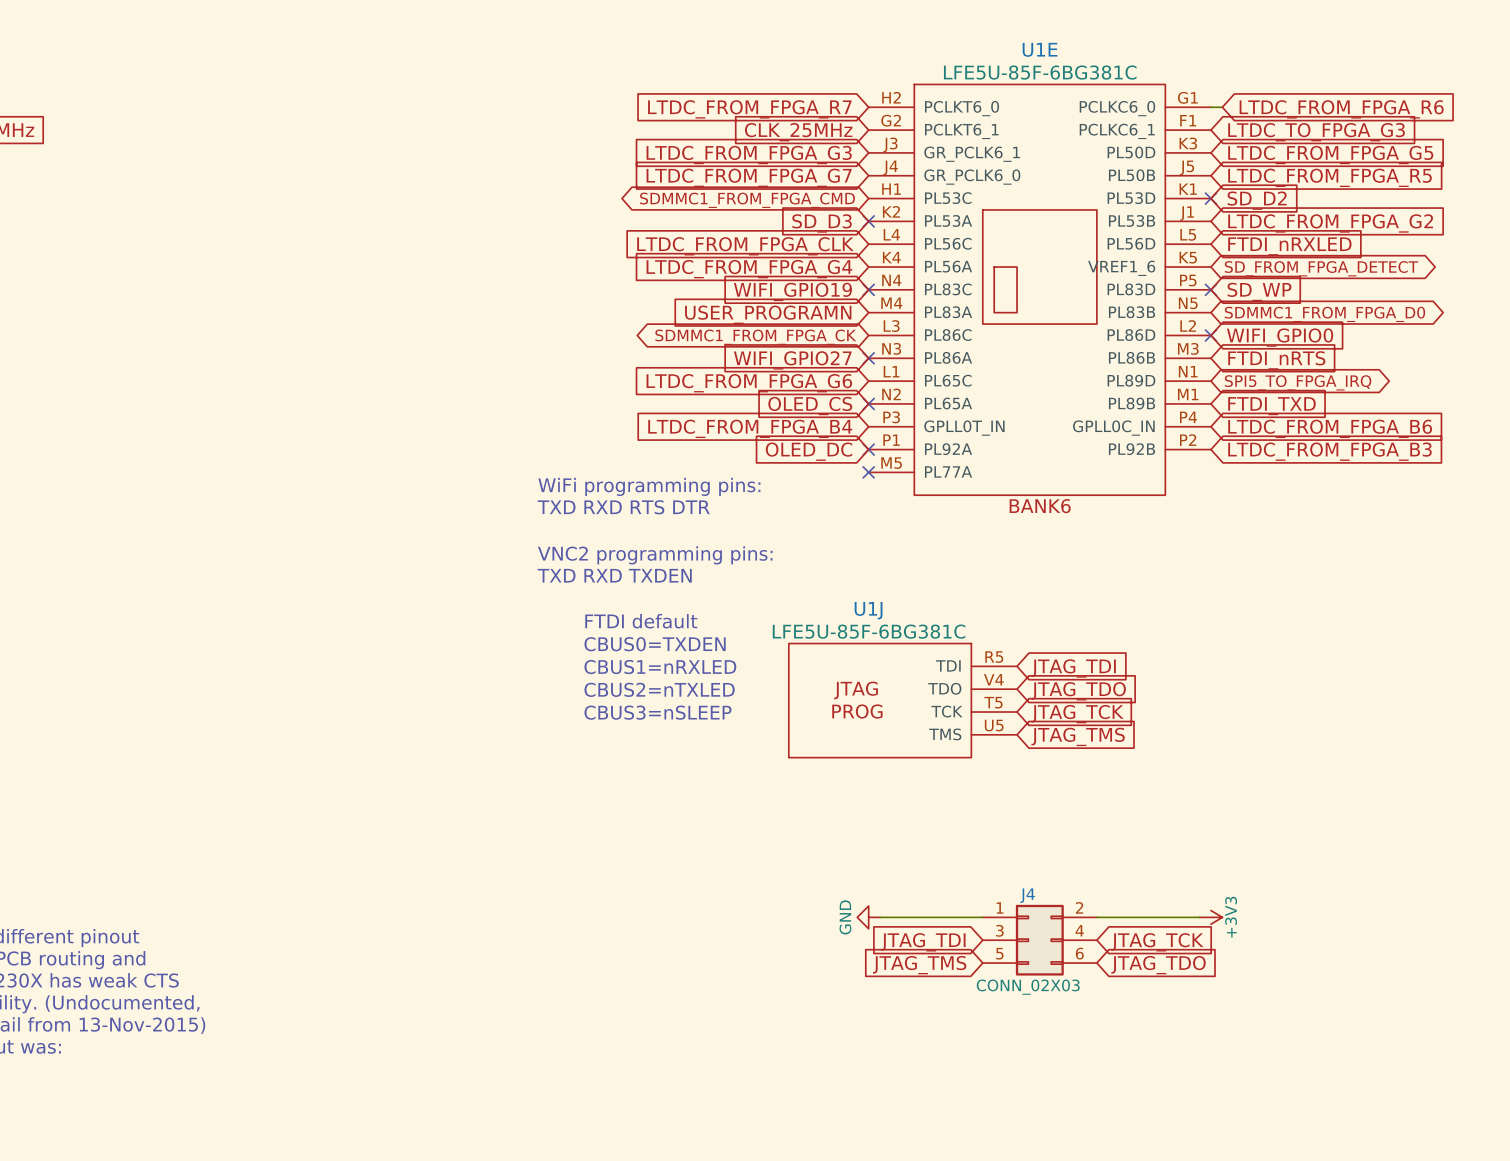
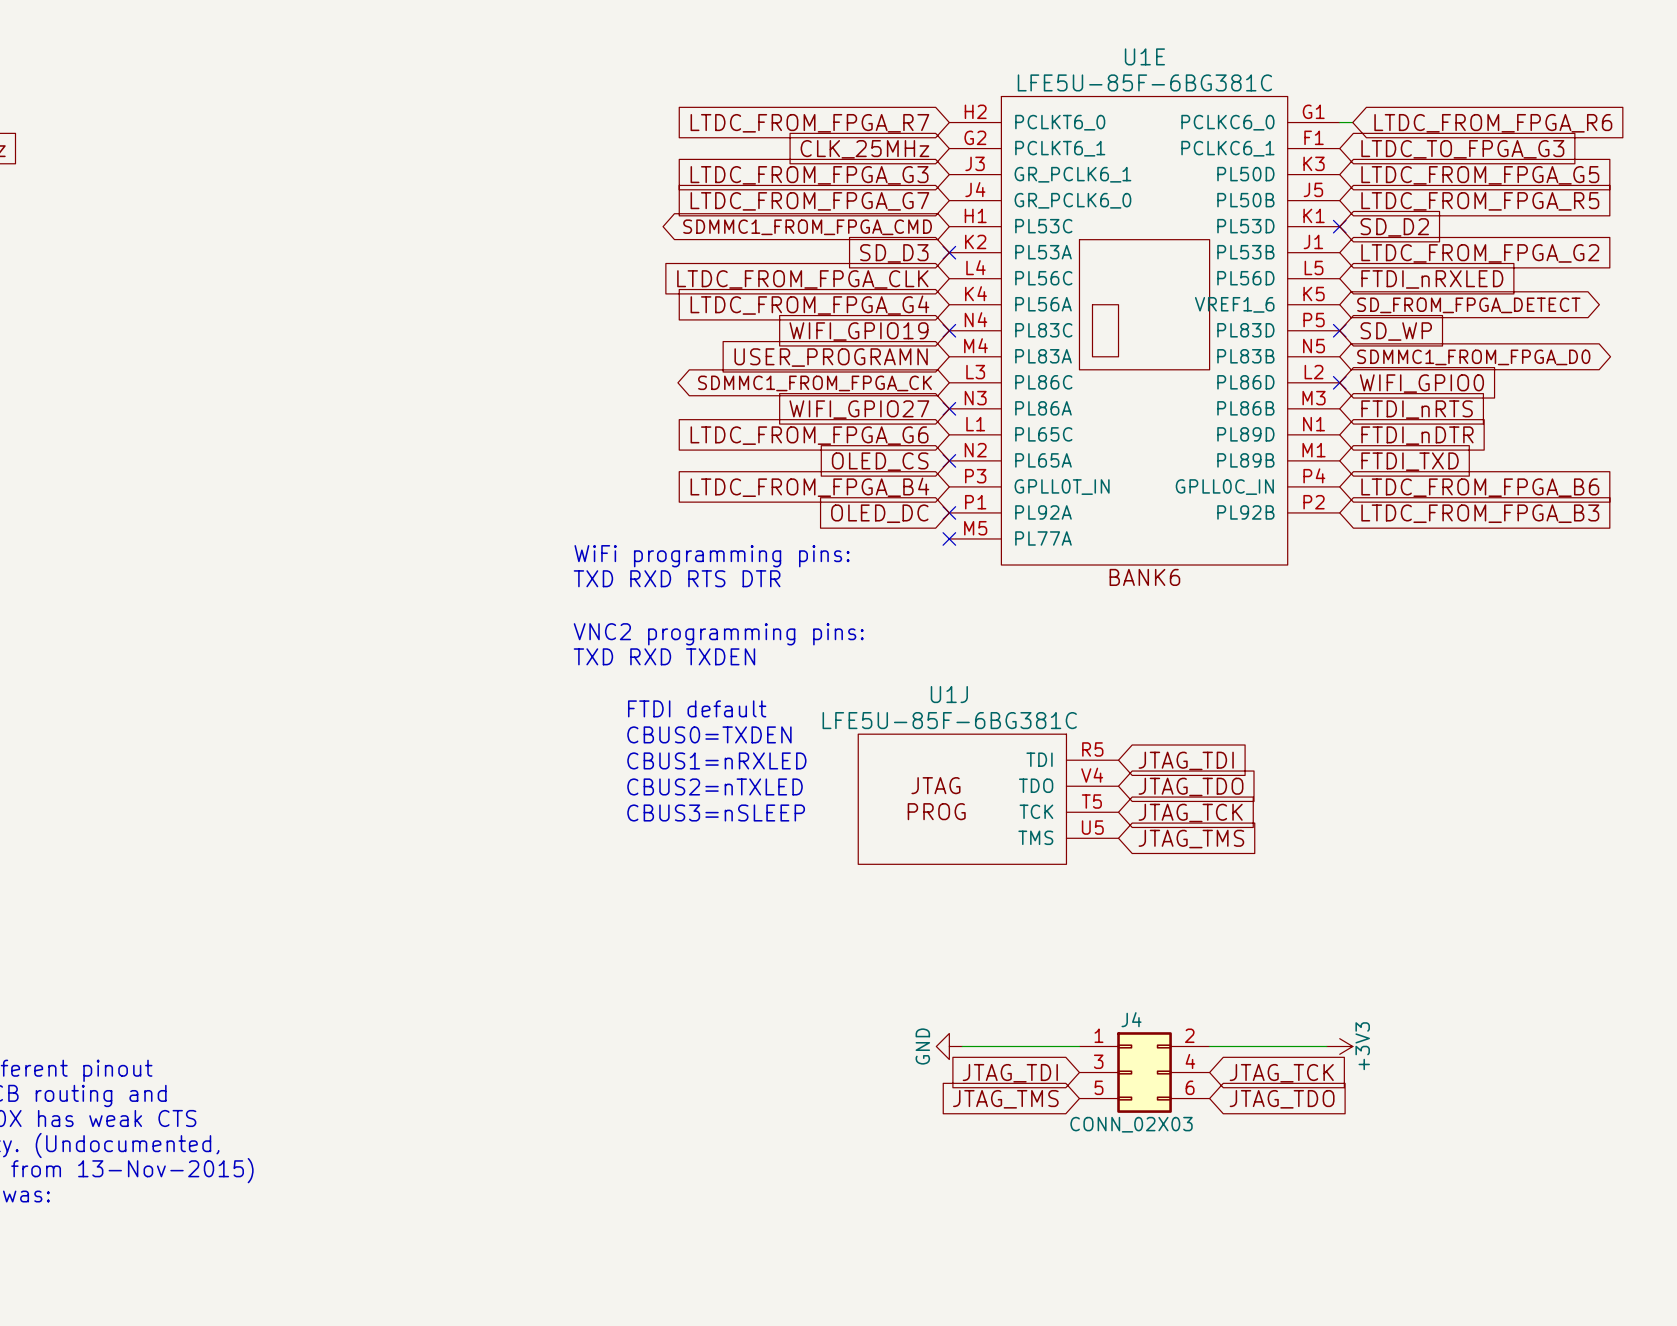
global label shape: bidirectional (1298, 382) -> input (1417, 435)
global label: SPI5_TO_FPGA_IRQ (1298, 382) -> FTDI_nDTR (1417, 435)

